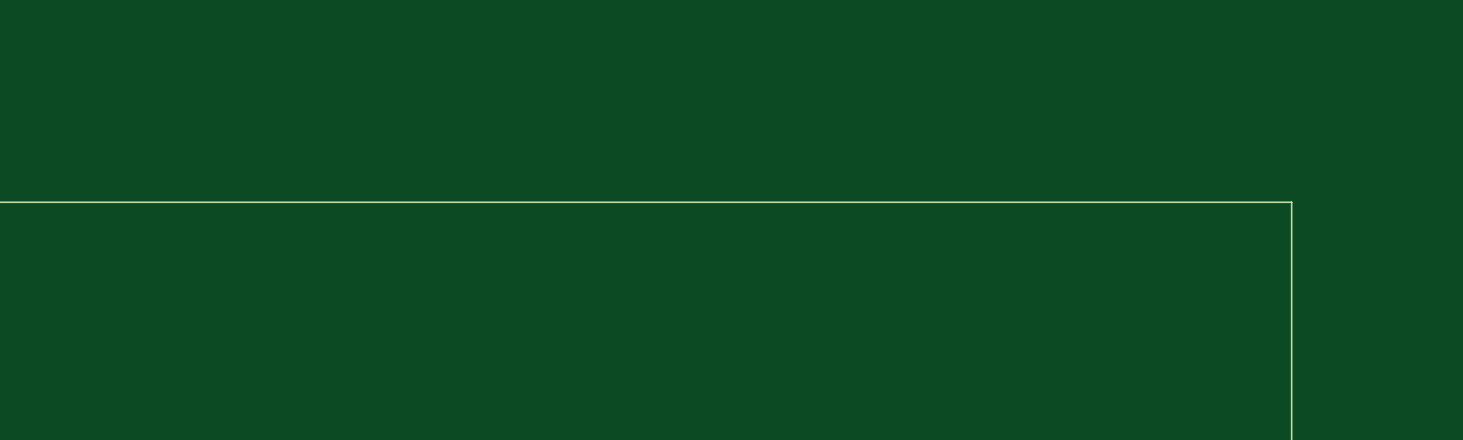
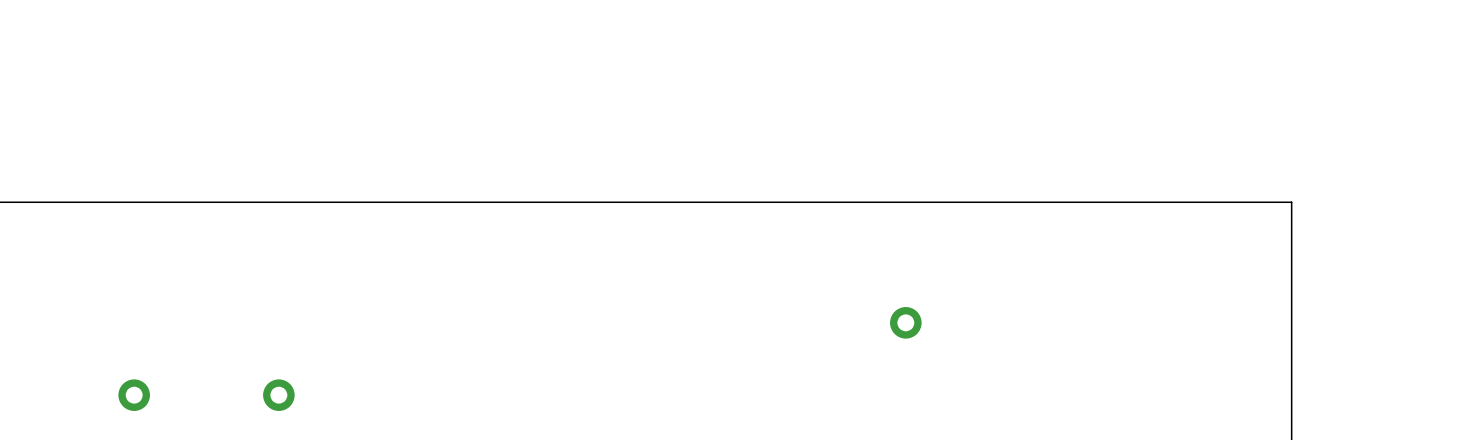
via: none -> (905, 322)
via: none -> (134, 395)
via: none -> (278, 395)

